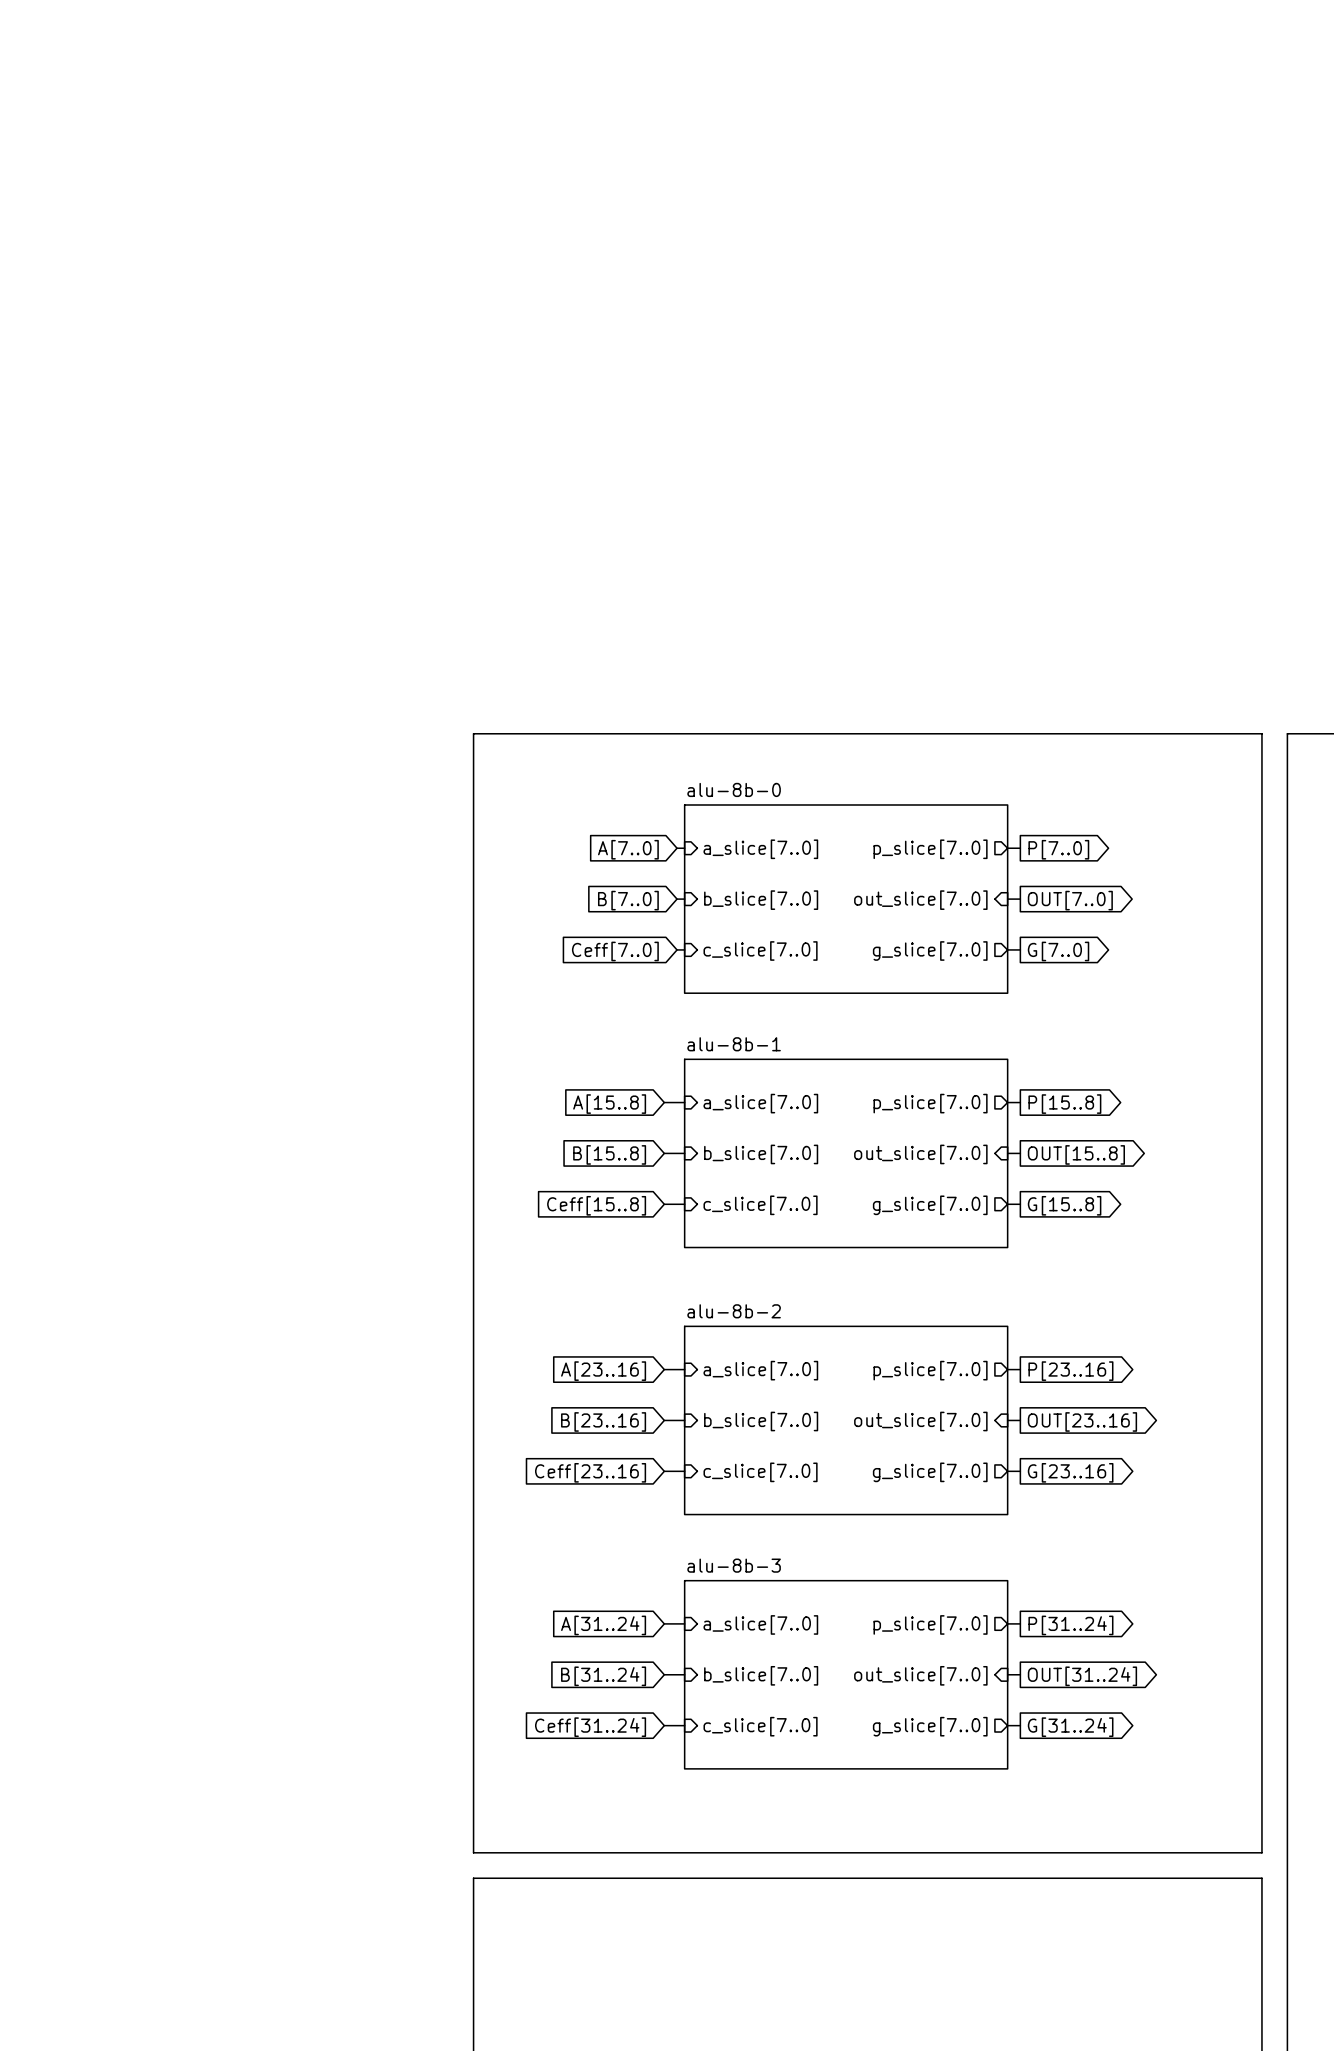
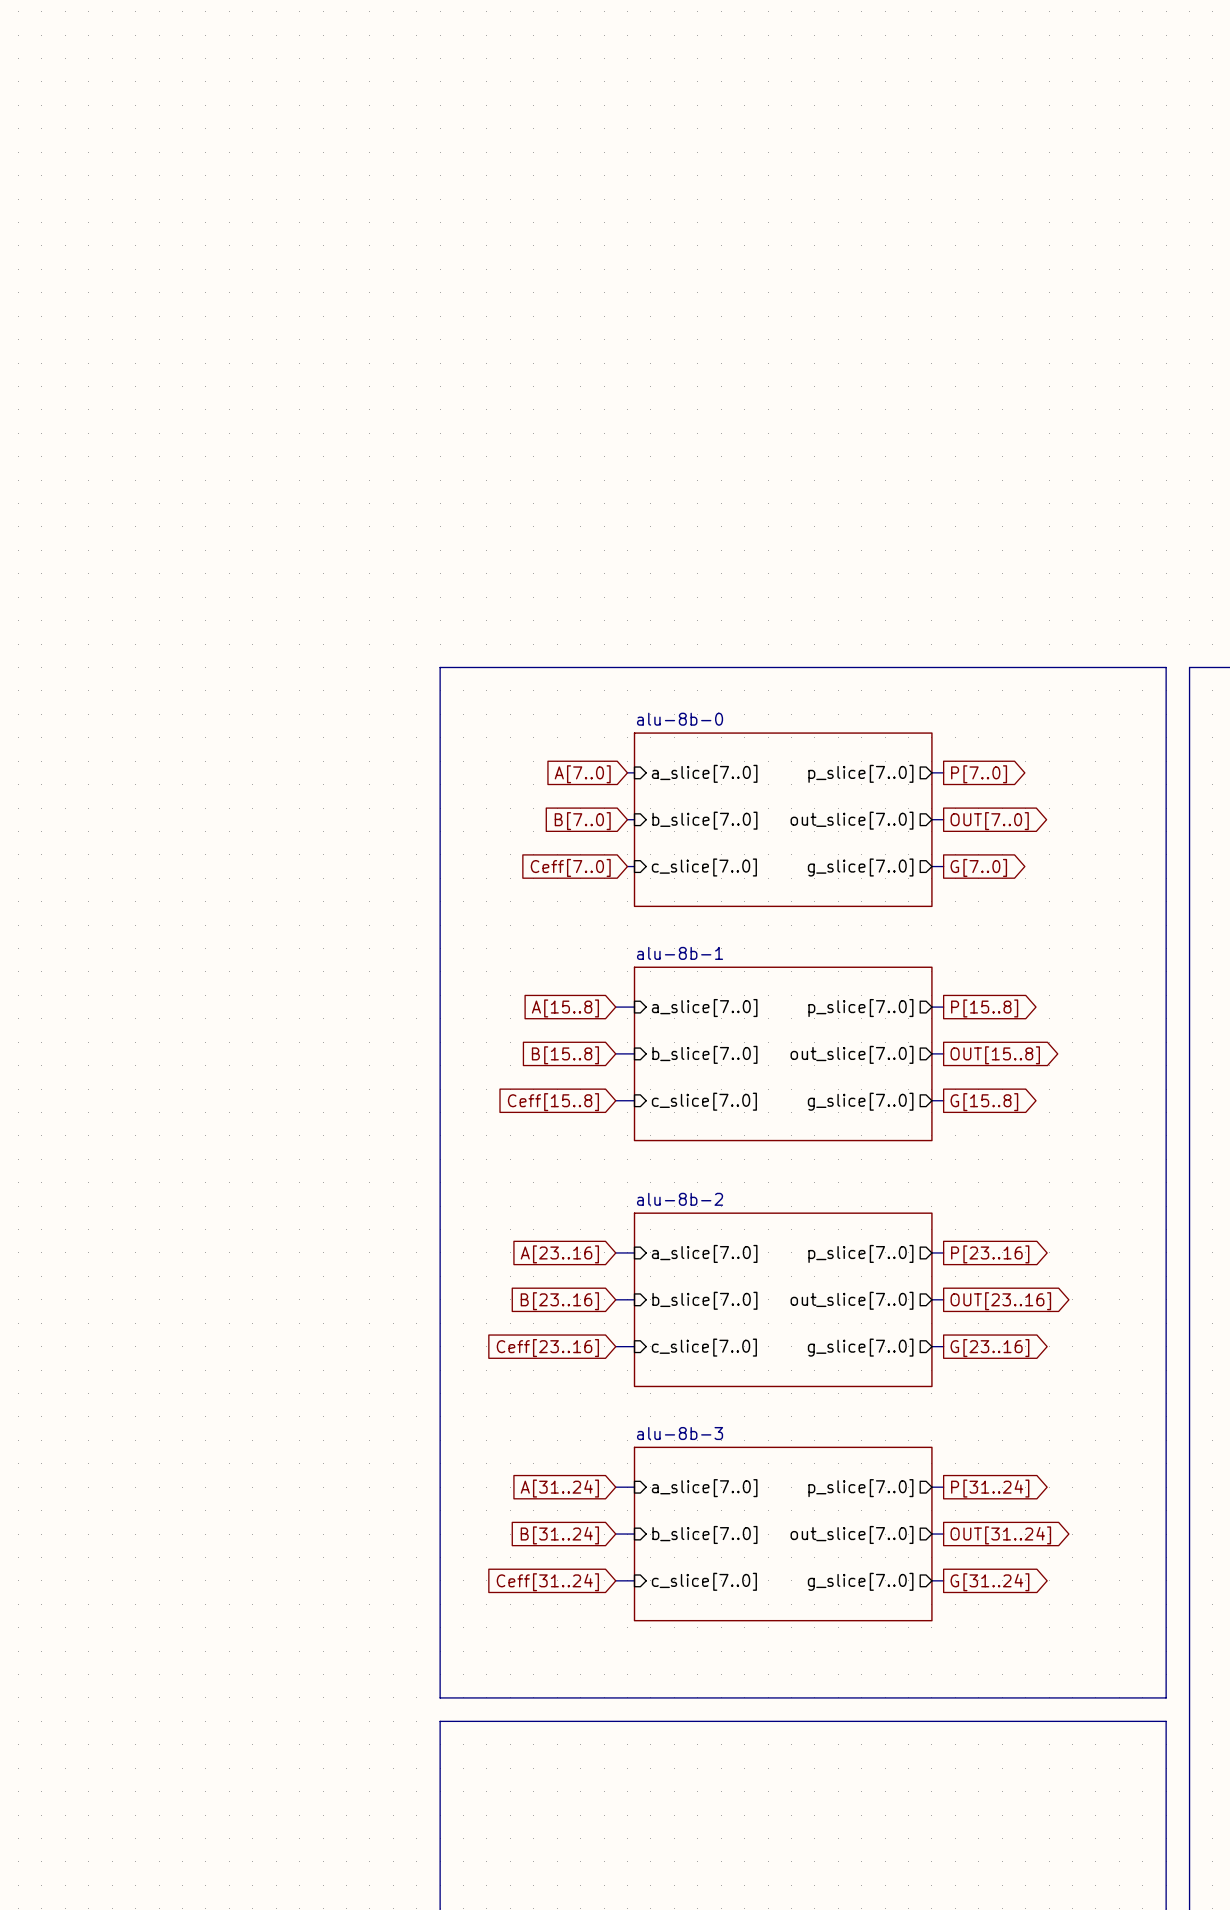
sheet pin shape: input (920, 900) -> output (852, 820)
sheet pin shape: input (920, 1154) -> output (852, 1054)
sheet pin shape: input (920, 1421) -> output (852, 1300)
sheet pin shape: input (920, 1675) -> output (852, 1534)

